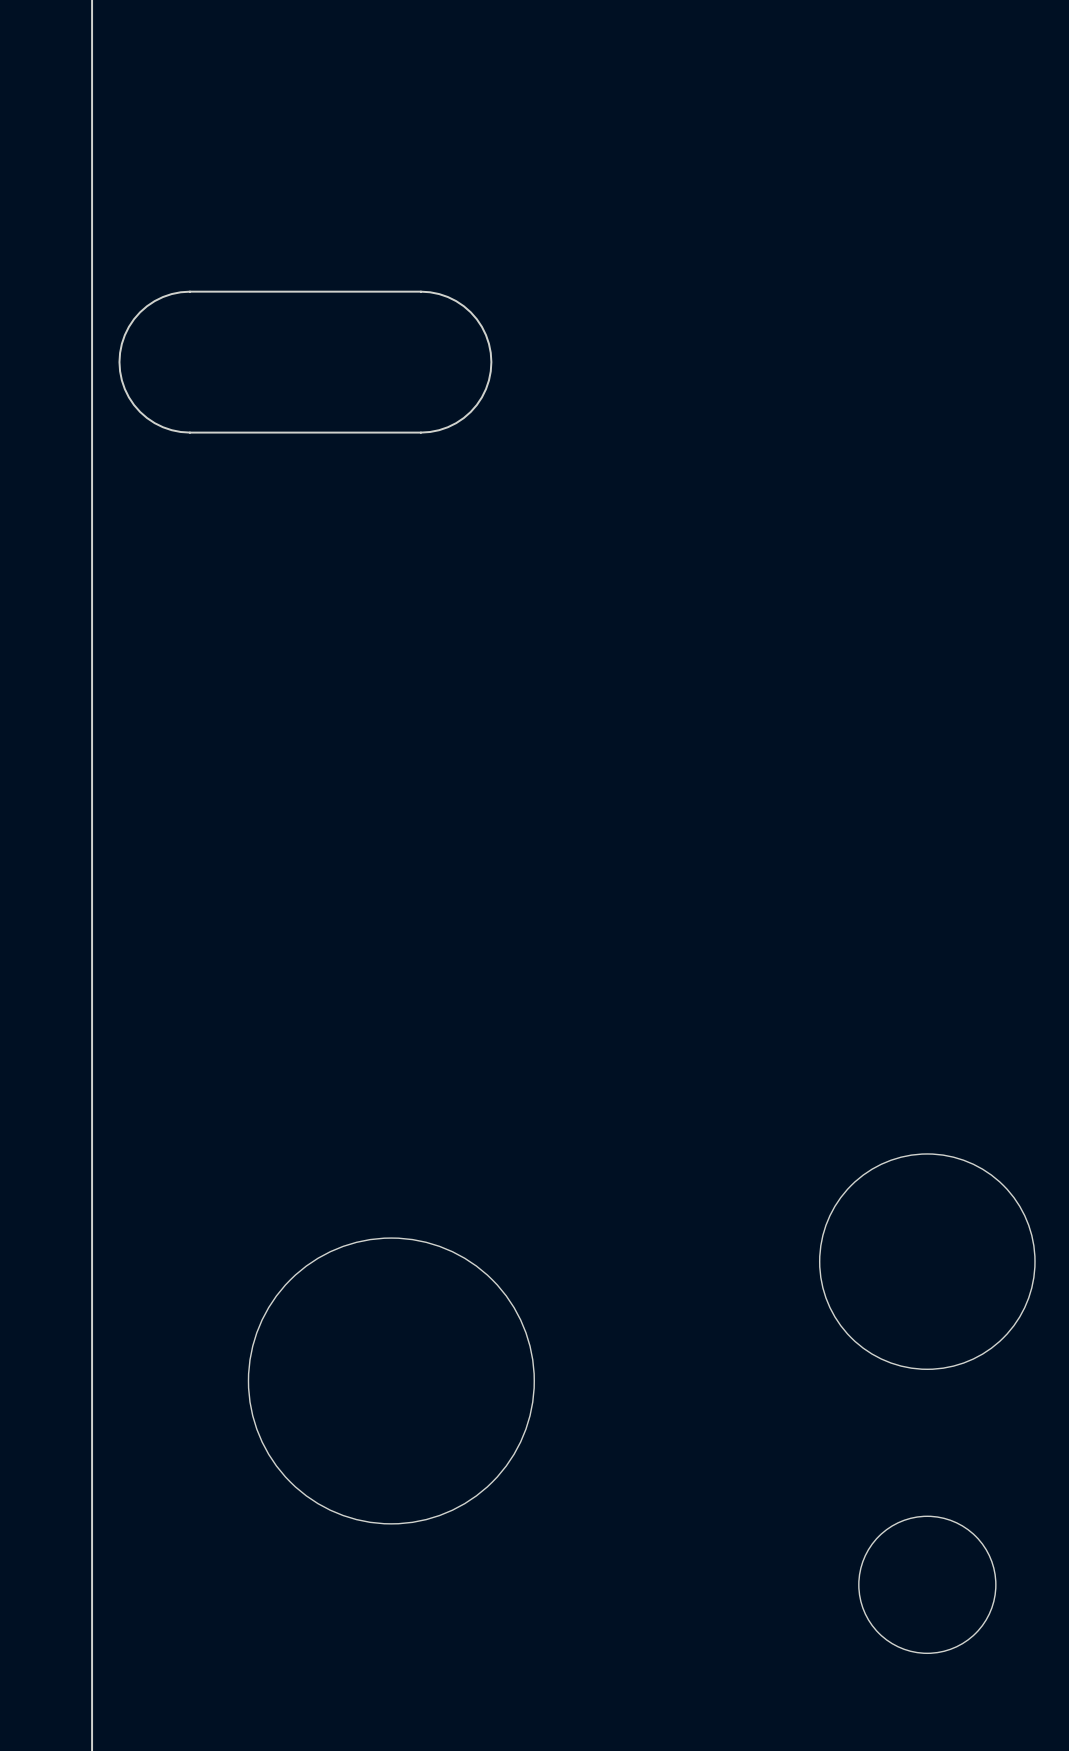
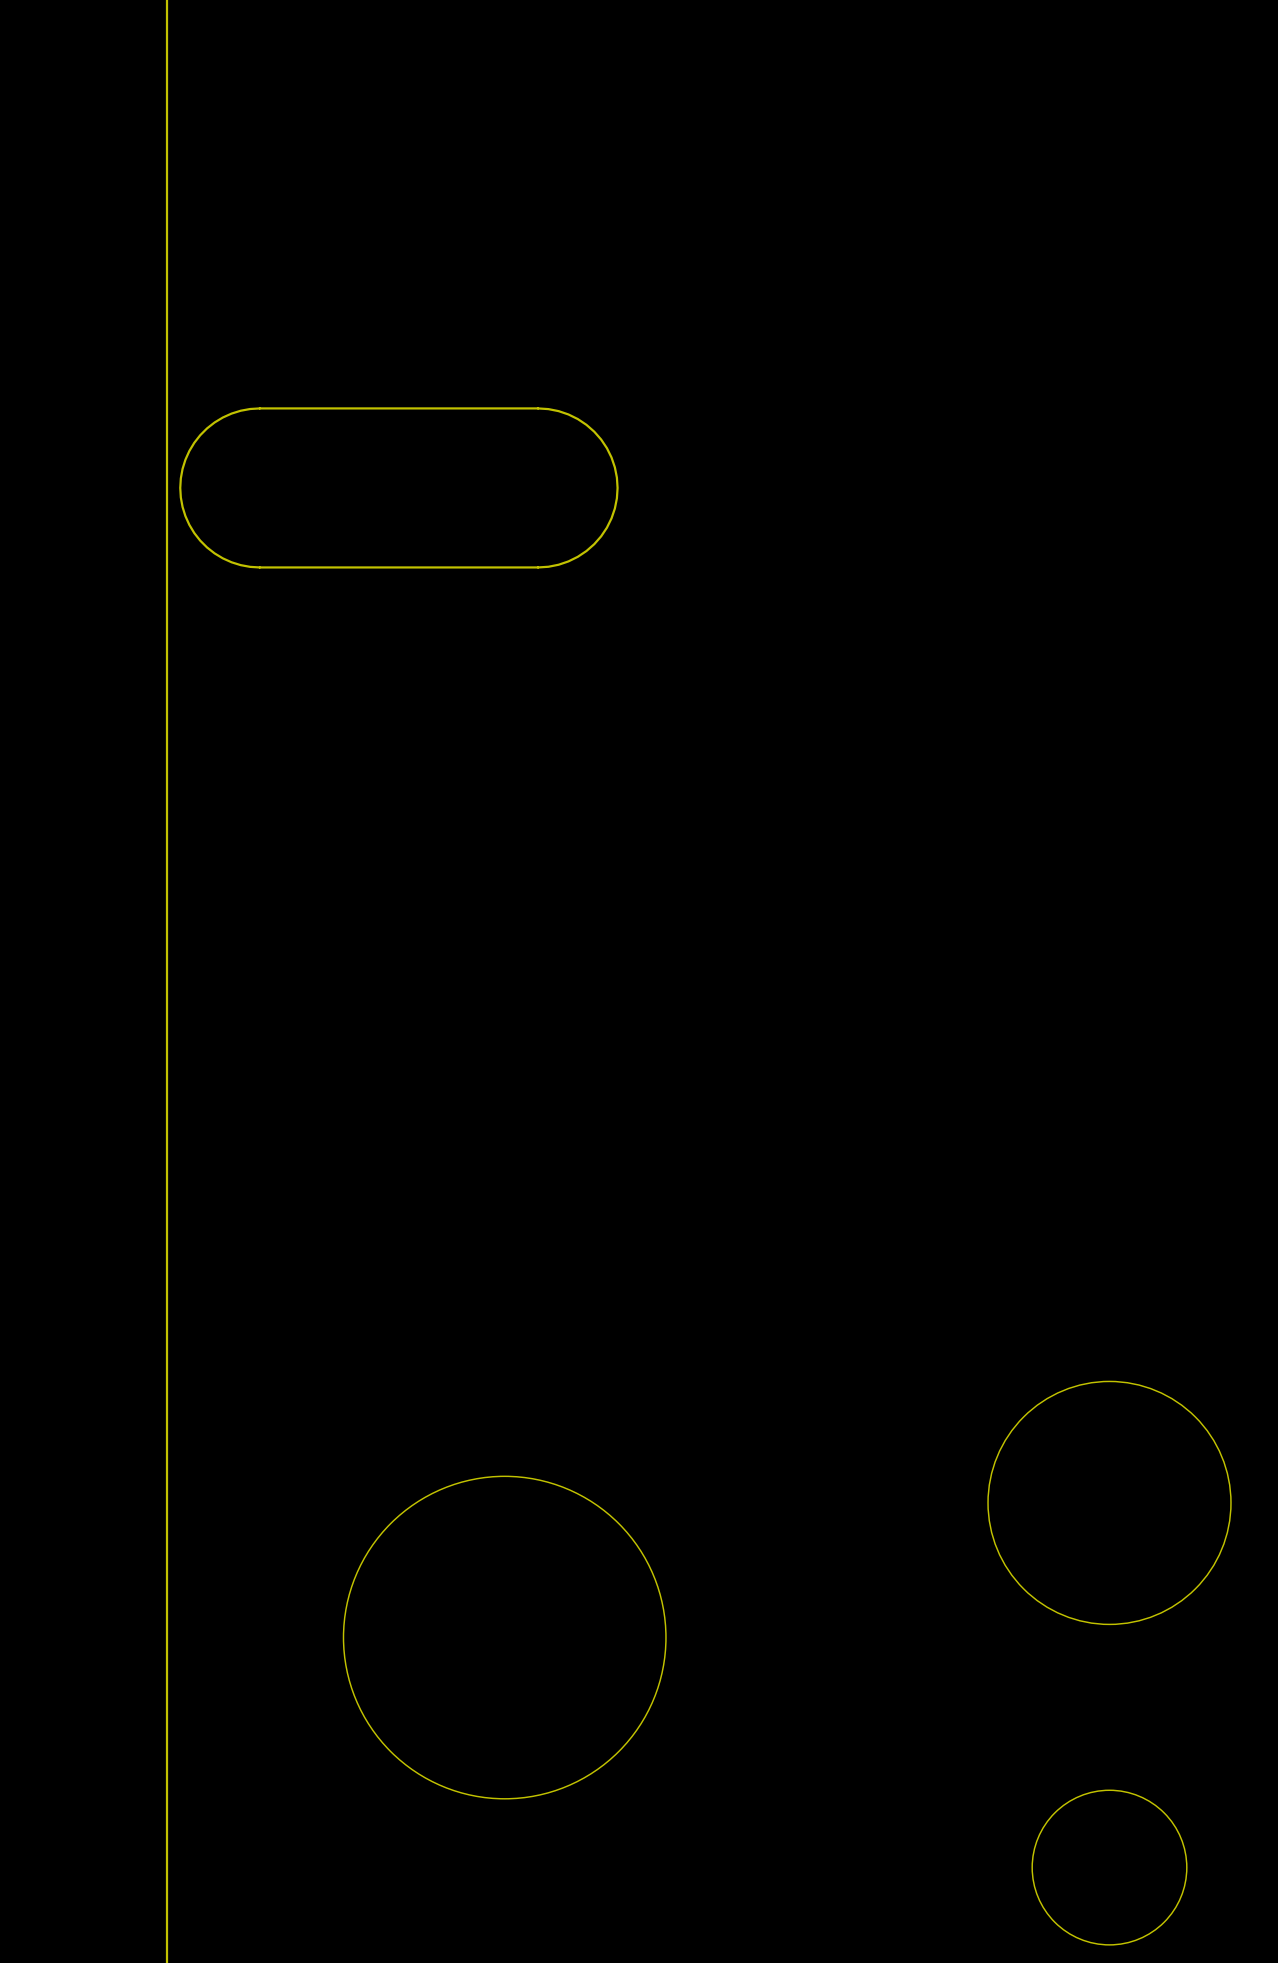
board edge: (189, 291) (162, 297) (140, 312) (124, 335) (119, 362) (124, 389) (140, 411) (162, 427) (189, 432) -> (277, 408) (240, 410) (222, 417) (207, 428) (194, 442) (185, 459) (180, 487) (182, 506) (189, 524) (207, 547) (222, 558) (240, 565) (277, 567)

